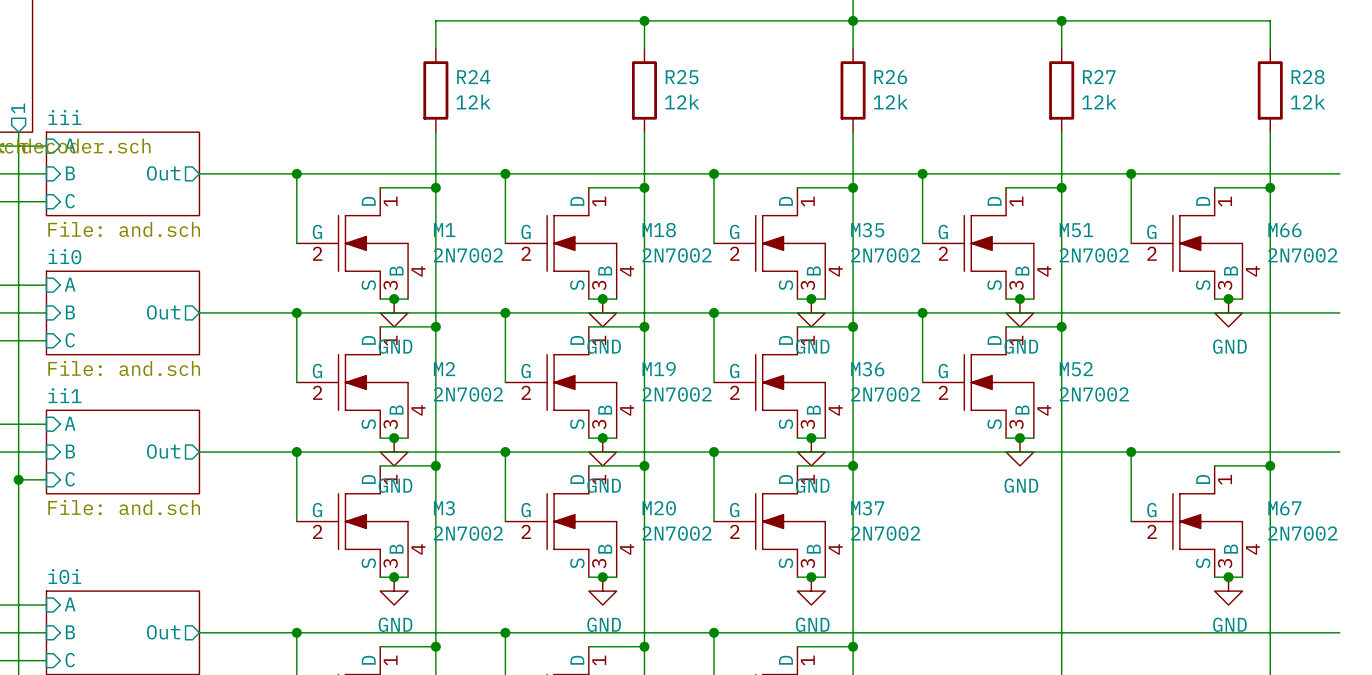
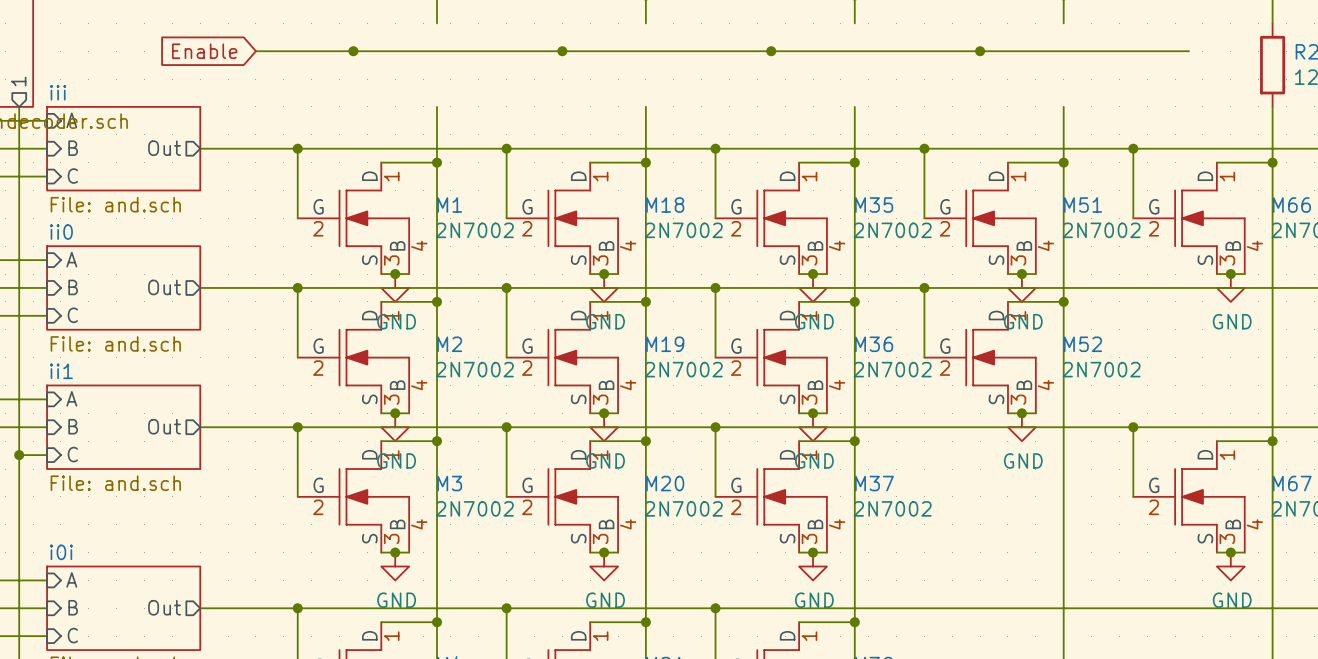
global label: none -> Enable (204, 51)
wire: none -> (255, 51) (1189, 51)
junction: none -> (353, 51)
junction: none -> (562, 51)
junction: none -> (771, 51)
junction: none -> (980, 51)
R24: 12k (435, 90) -> none
R25: 12k (644, 90) -> none
R26: 12k (853, 90) -> none
R27: 12k (1061, 90) -> none

